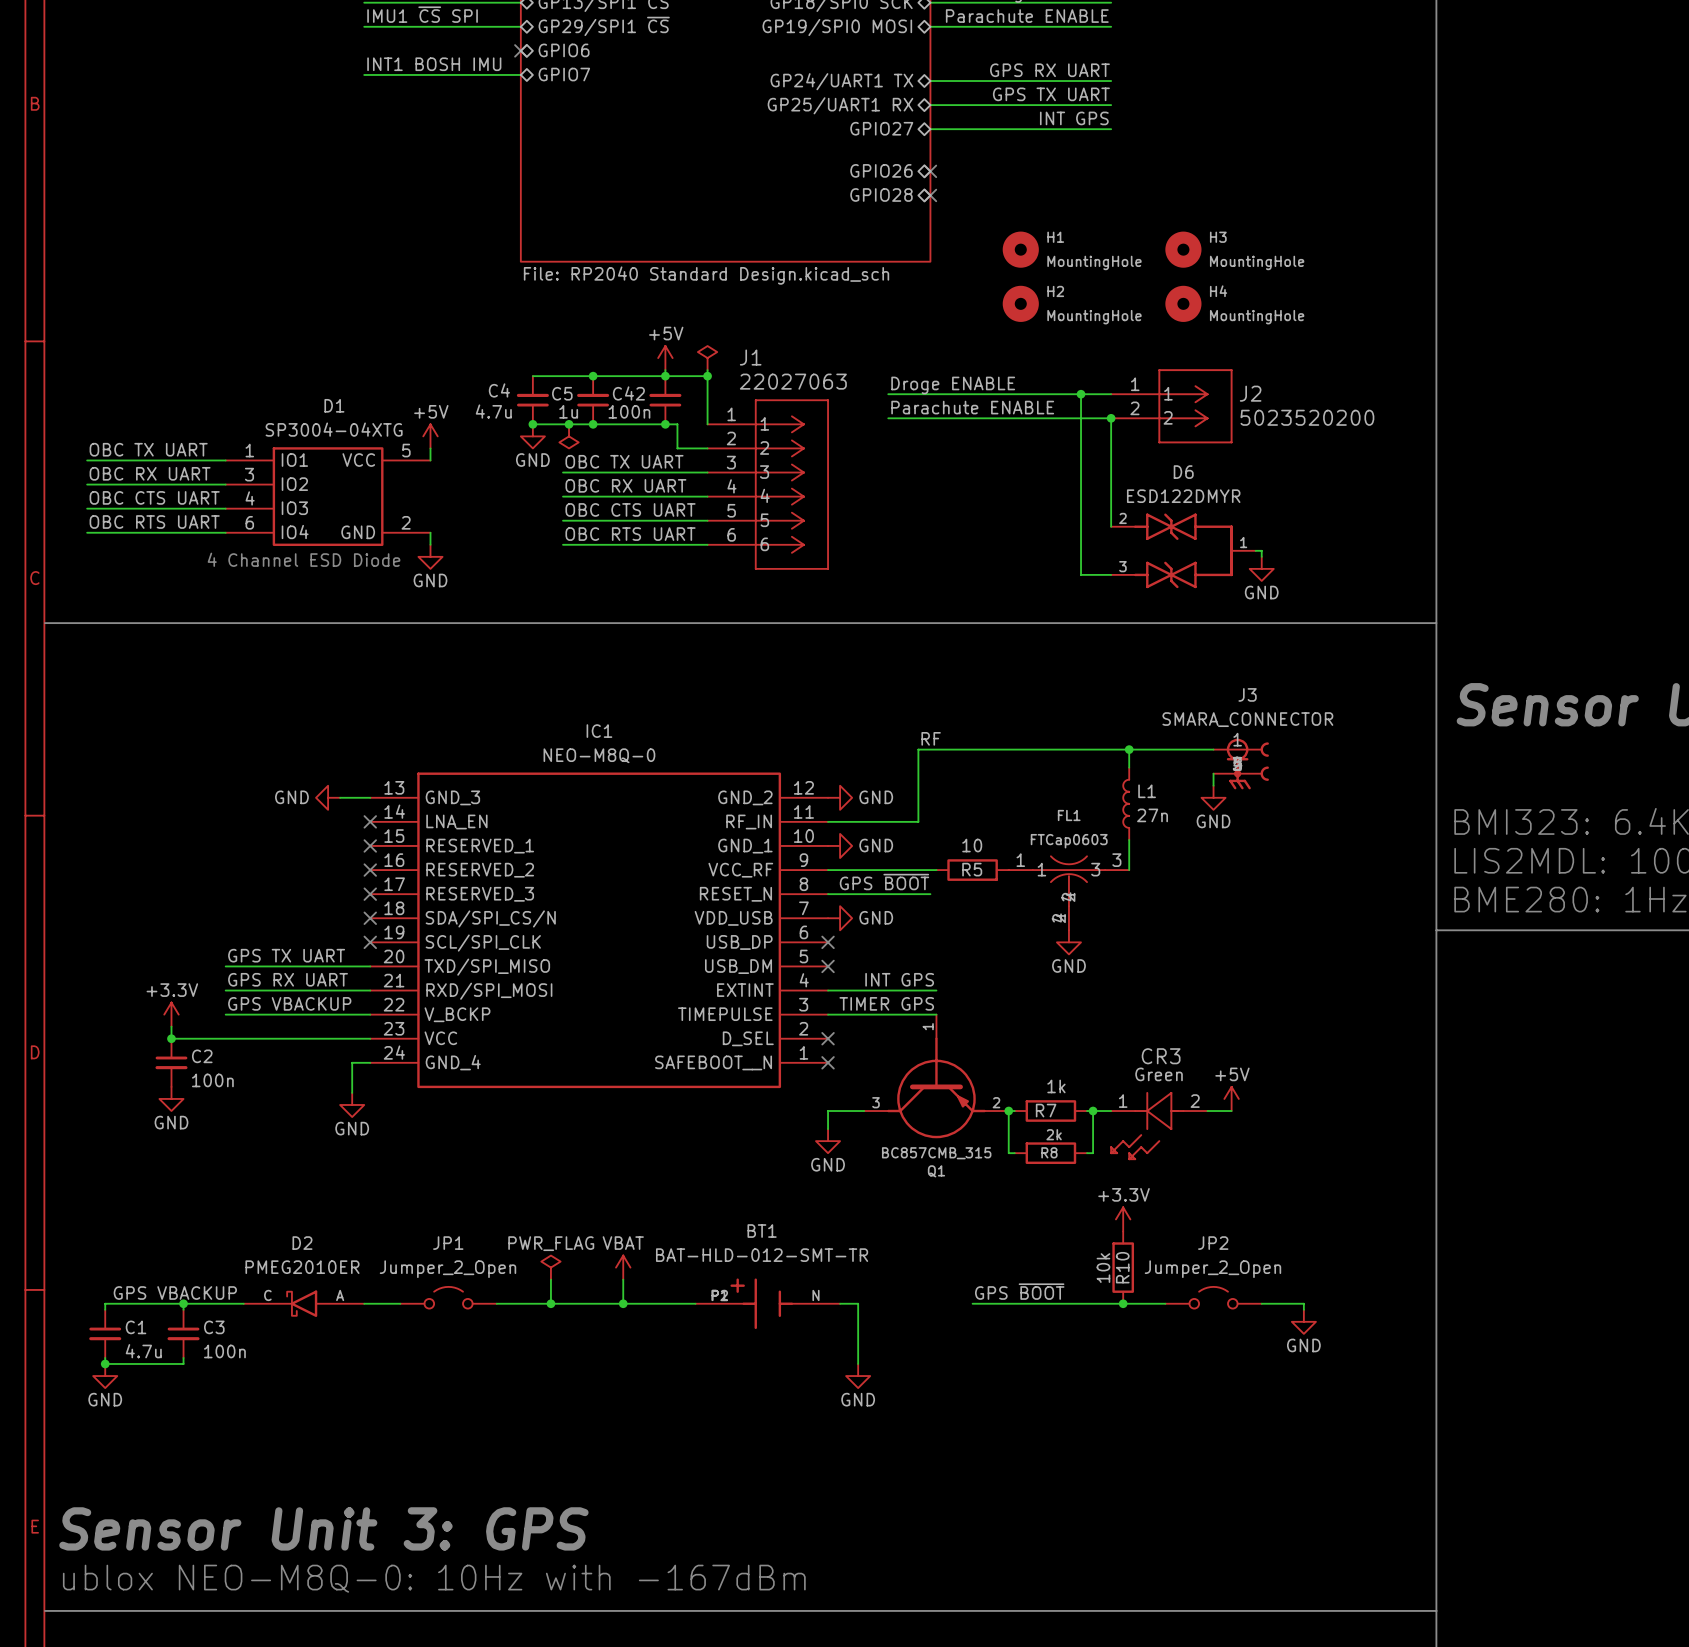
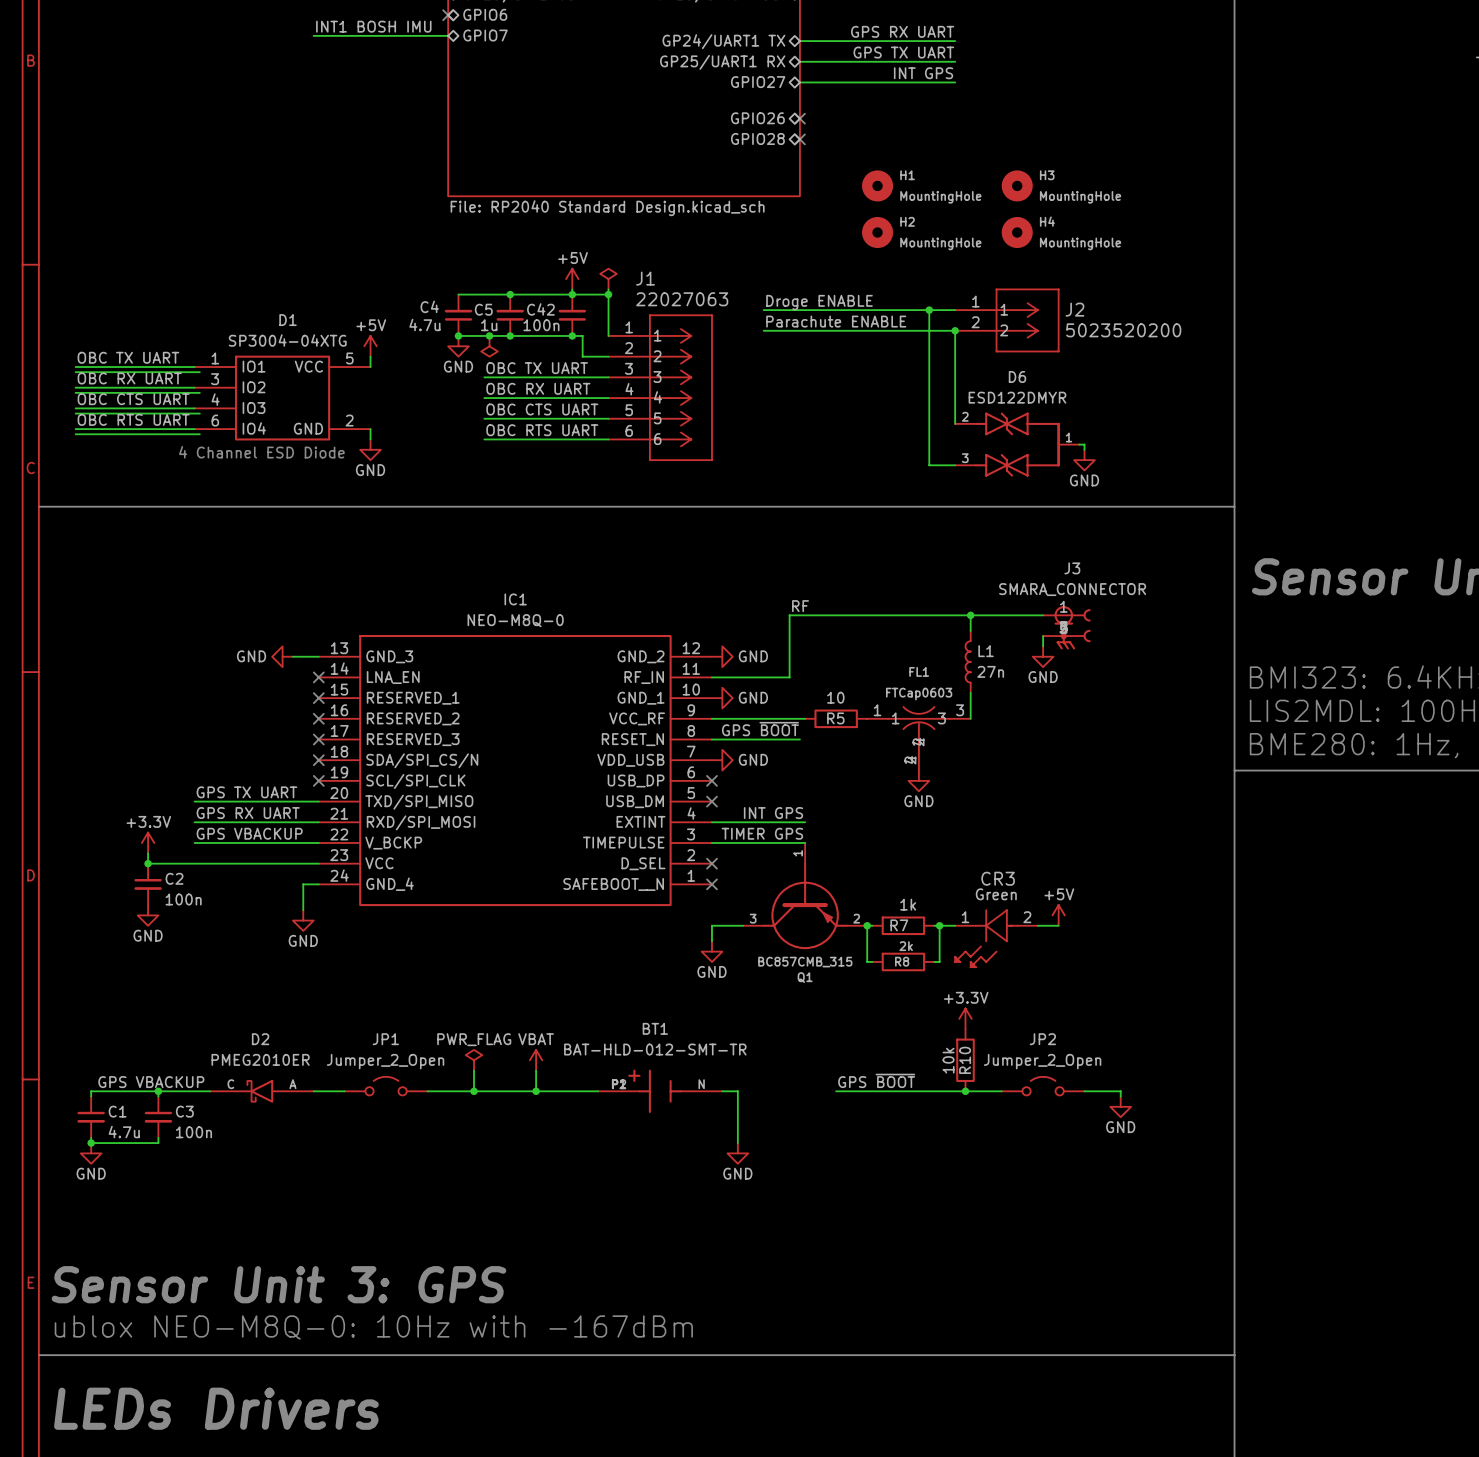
wire: none -> (75, 372) (199, 372)
wire: none -> (75, 392) (199, 392)
wire: none -> (75, 413) (199, 413)
wire: none -> (75, 434) (199, 434)

